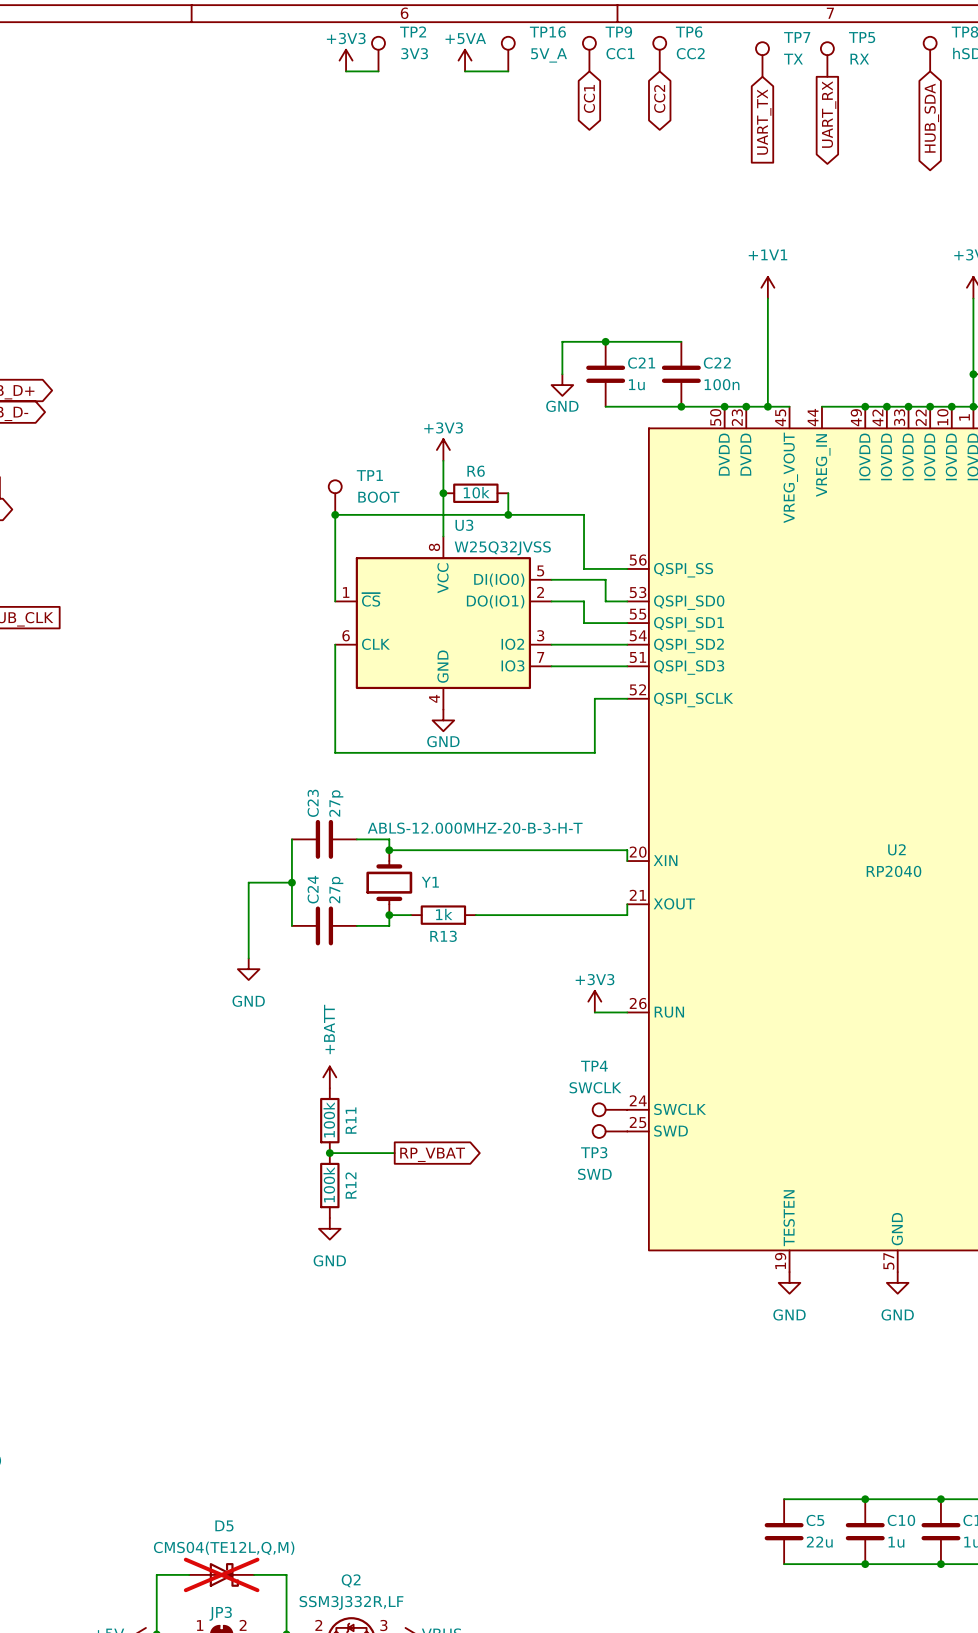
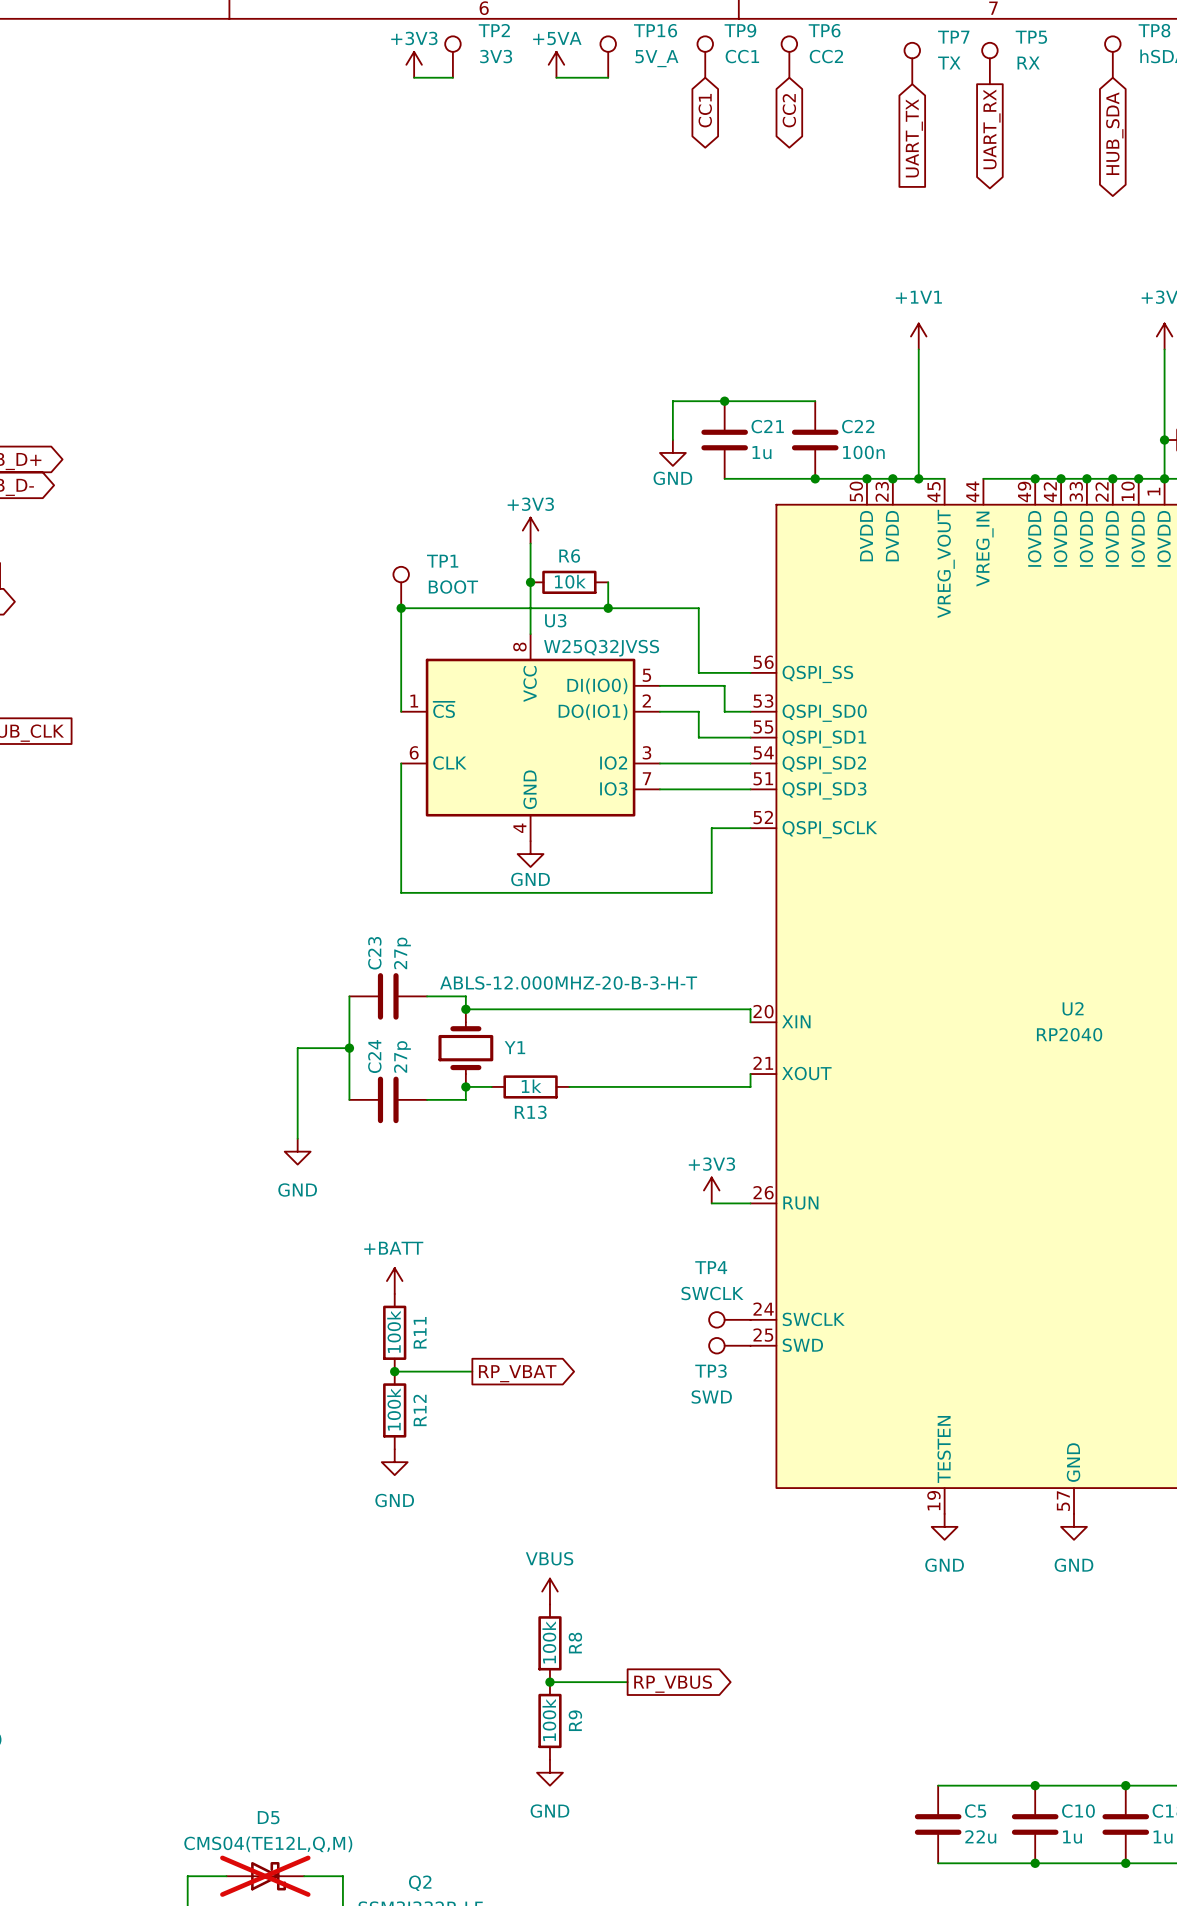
power symbol text rotation: 0° (329, 1029) -> 90° clockwise (393, 1248)
power symbol: none -> VBUS (549, 1591)
R8: none -> 100k (549, 1643)
wire: none -> (549, 1682) (627, 1682)
junction: none -> (549, 1682)
global label: none -> RP_VBUS (673, 1684)
R9: none -> 100k (549, 1720)
power symbol: none -> GND (549, 1772)

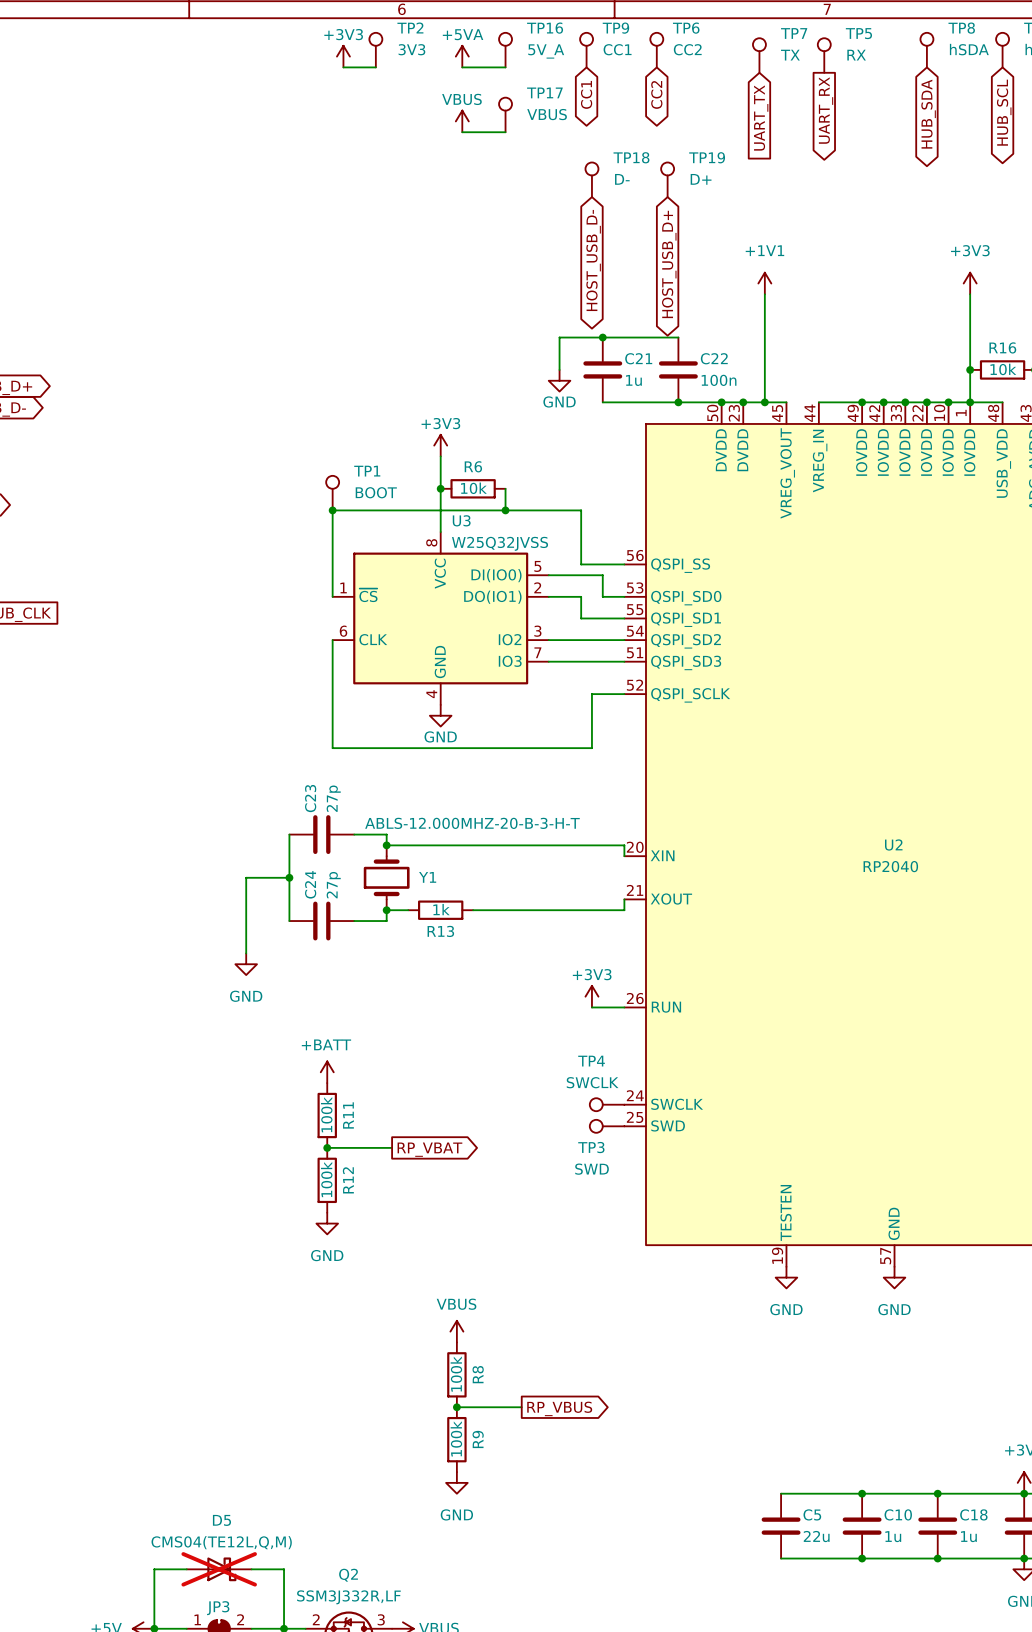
TP17: none -> VBUS (505, 114)
power symbol: none -> VBUS (462, 121)
wire: none -> (462, 132) (505, 132)
TP18: none -> D- (591, 179)
TP19: none -> D+ (667, 179)
global label: none -> HOST_USB_D- (593, 260)
global label: none -> HOST_USB_D+ (669, 264)

